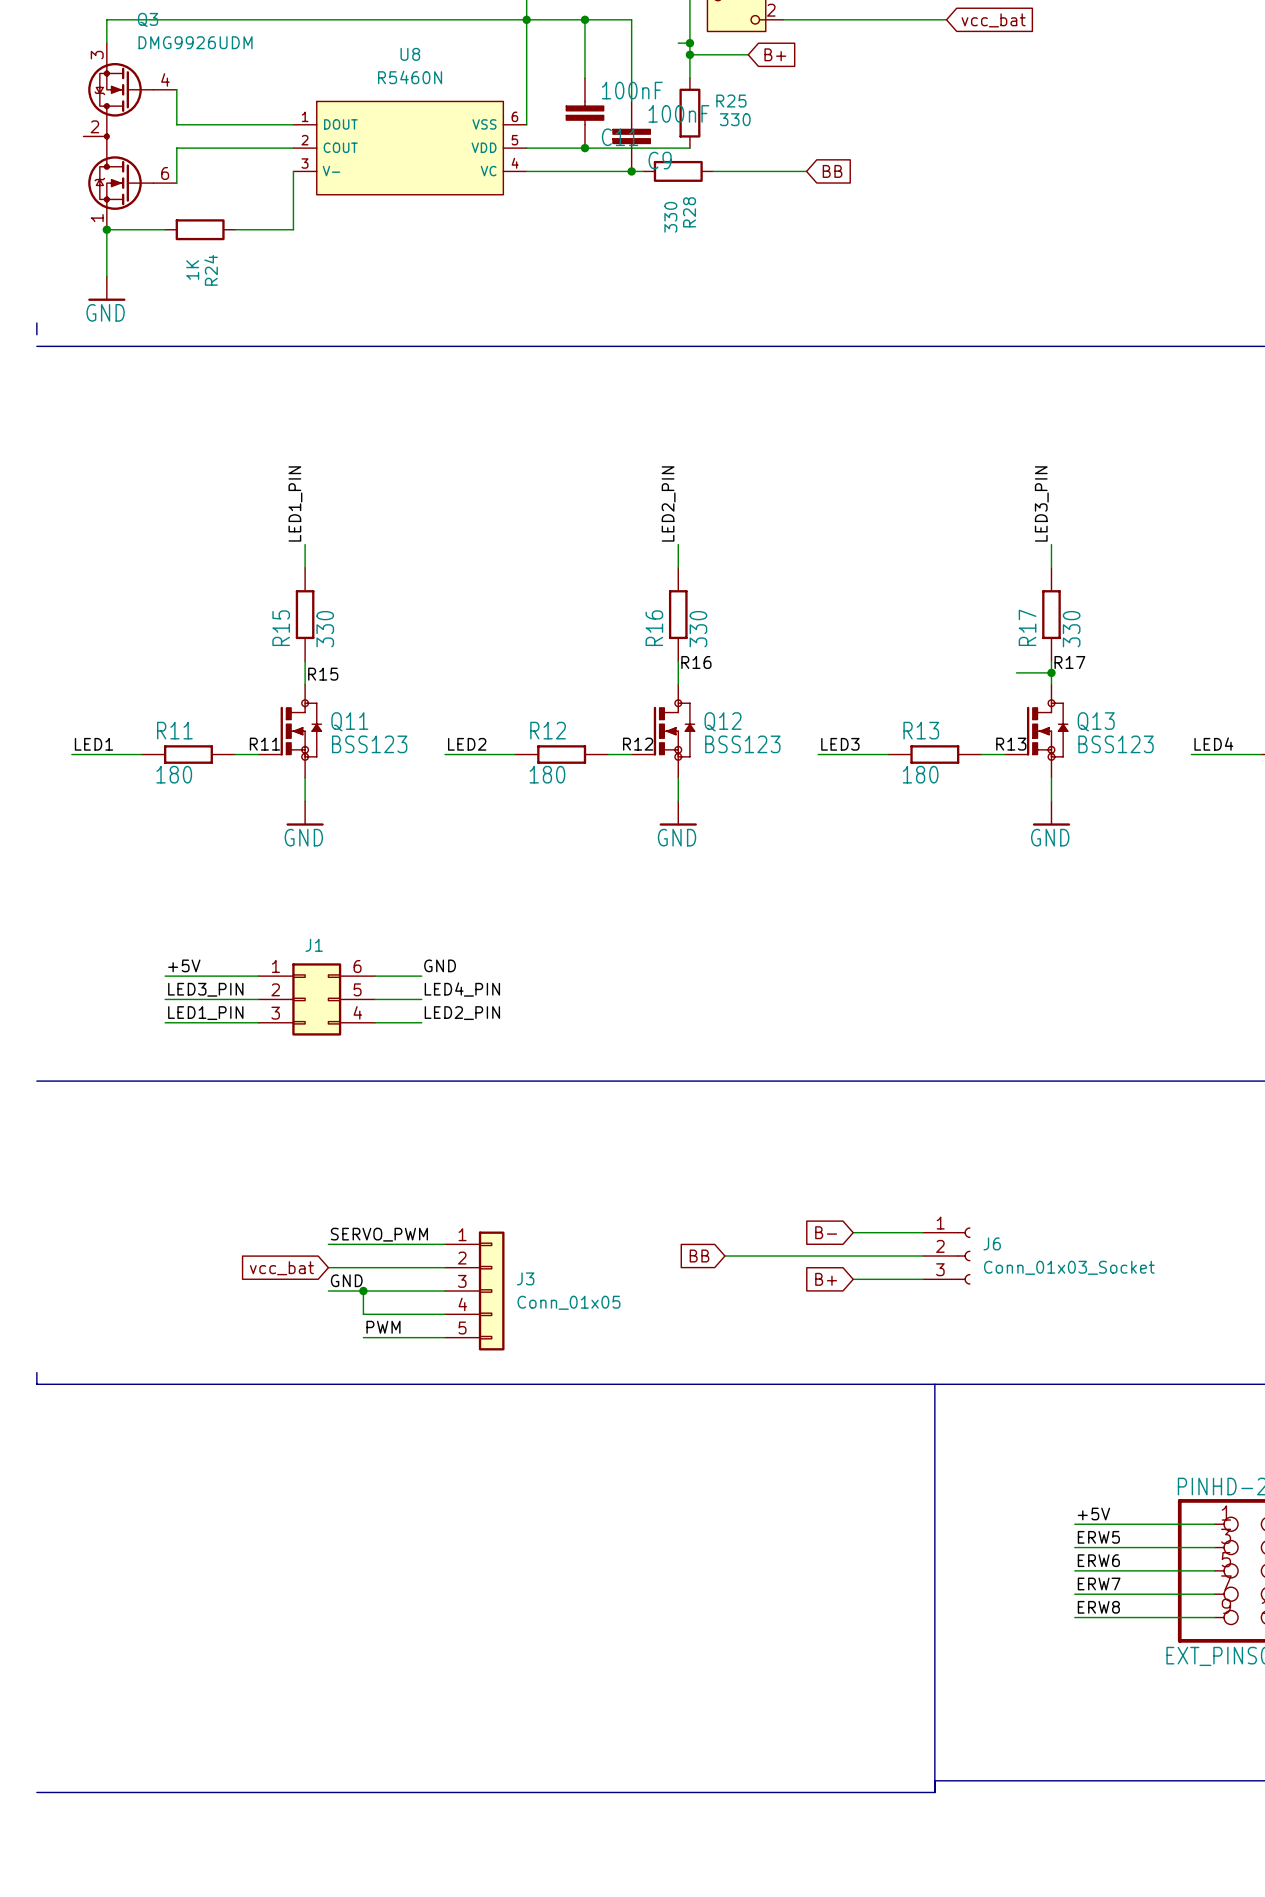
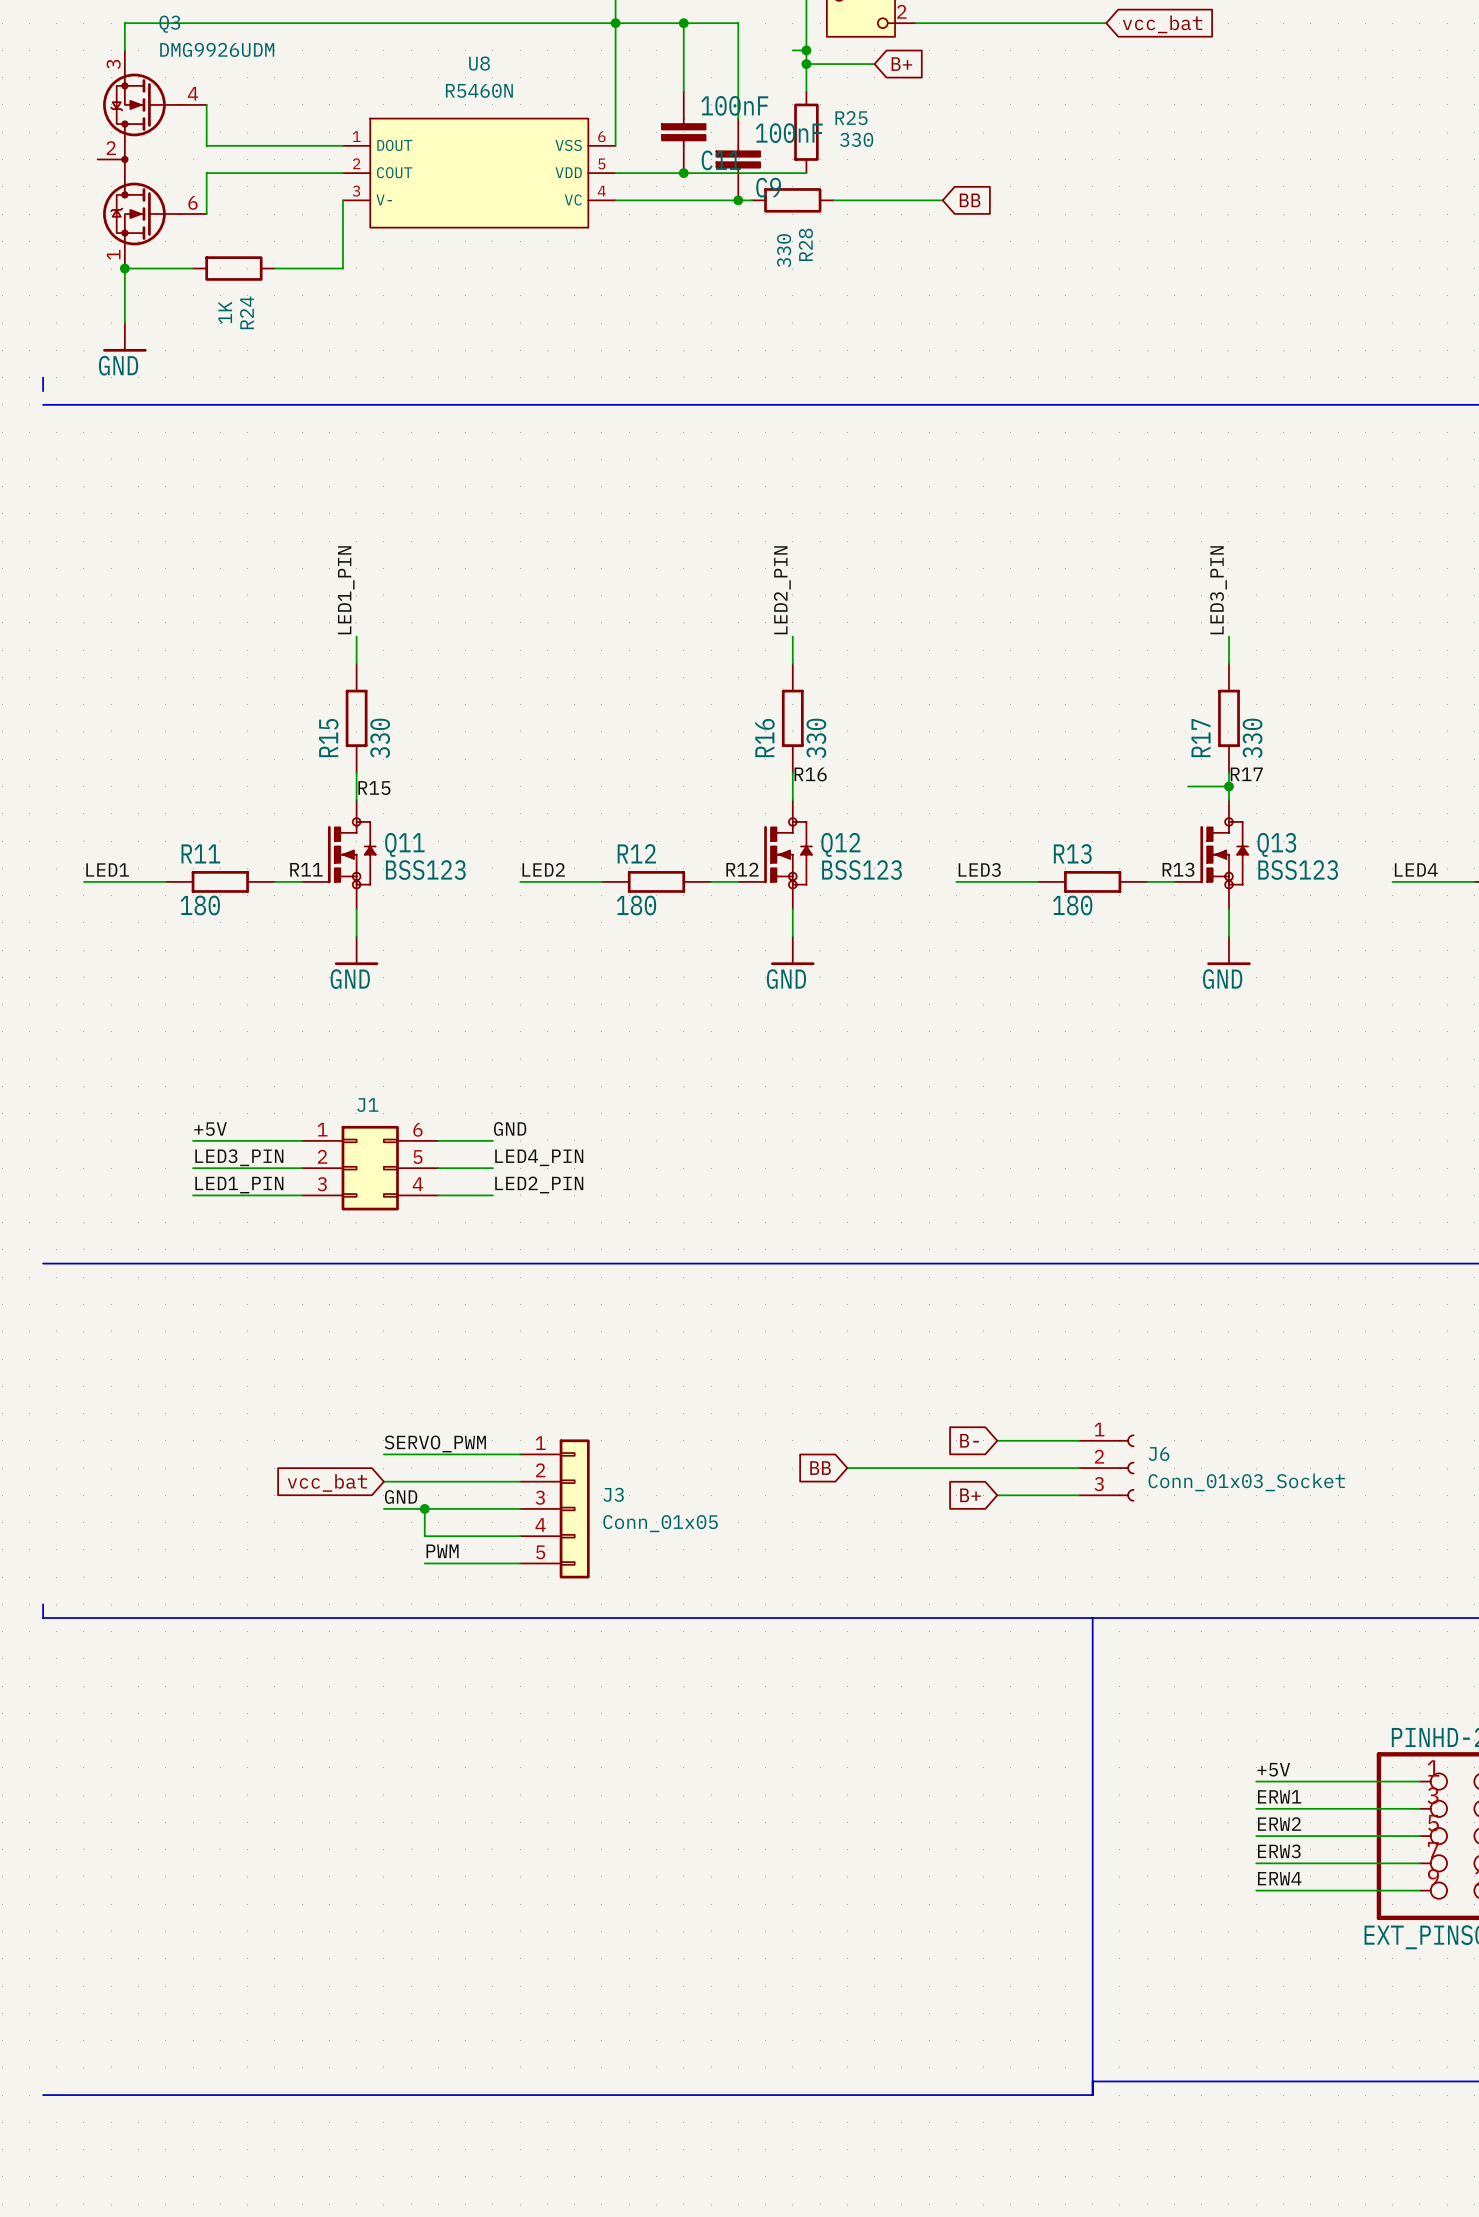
label: ERW5 (1098, 1537) -> ERW1 (1279, 1796)
label: ERW6 (1098, 1560) -> ERW2 (1279, 1824)
label: ERW7 (1099, 1583) -> ERW3 (1279, 1851)
label: ERW8 (1098, 1607) -> ERW4 (1279, 1878)

